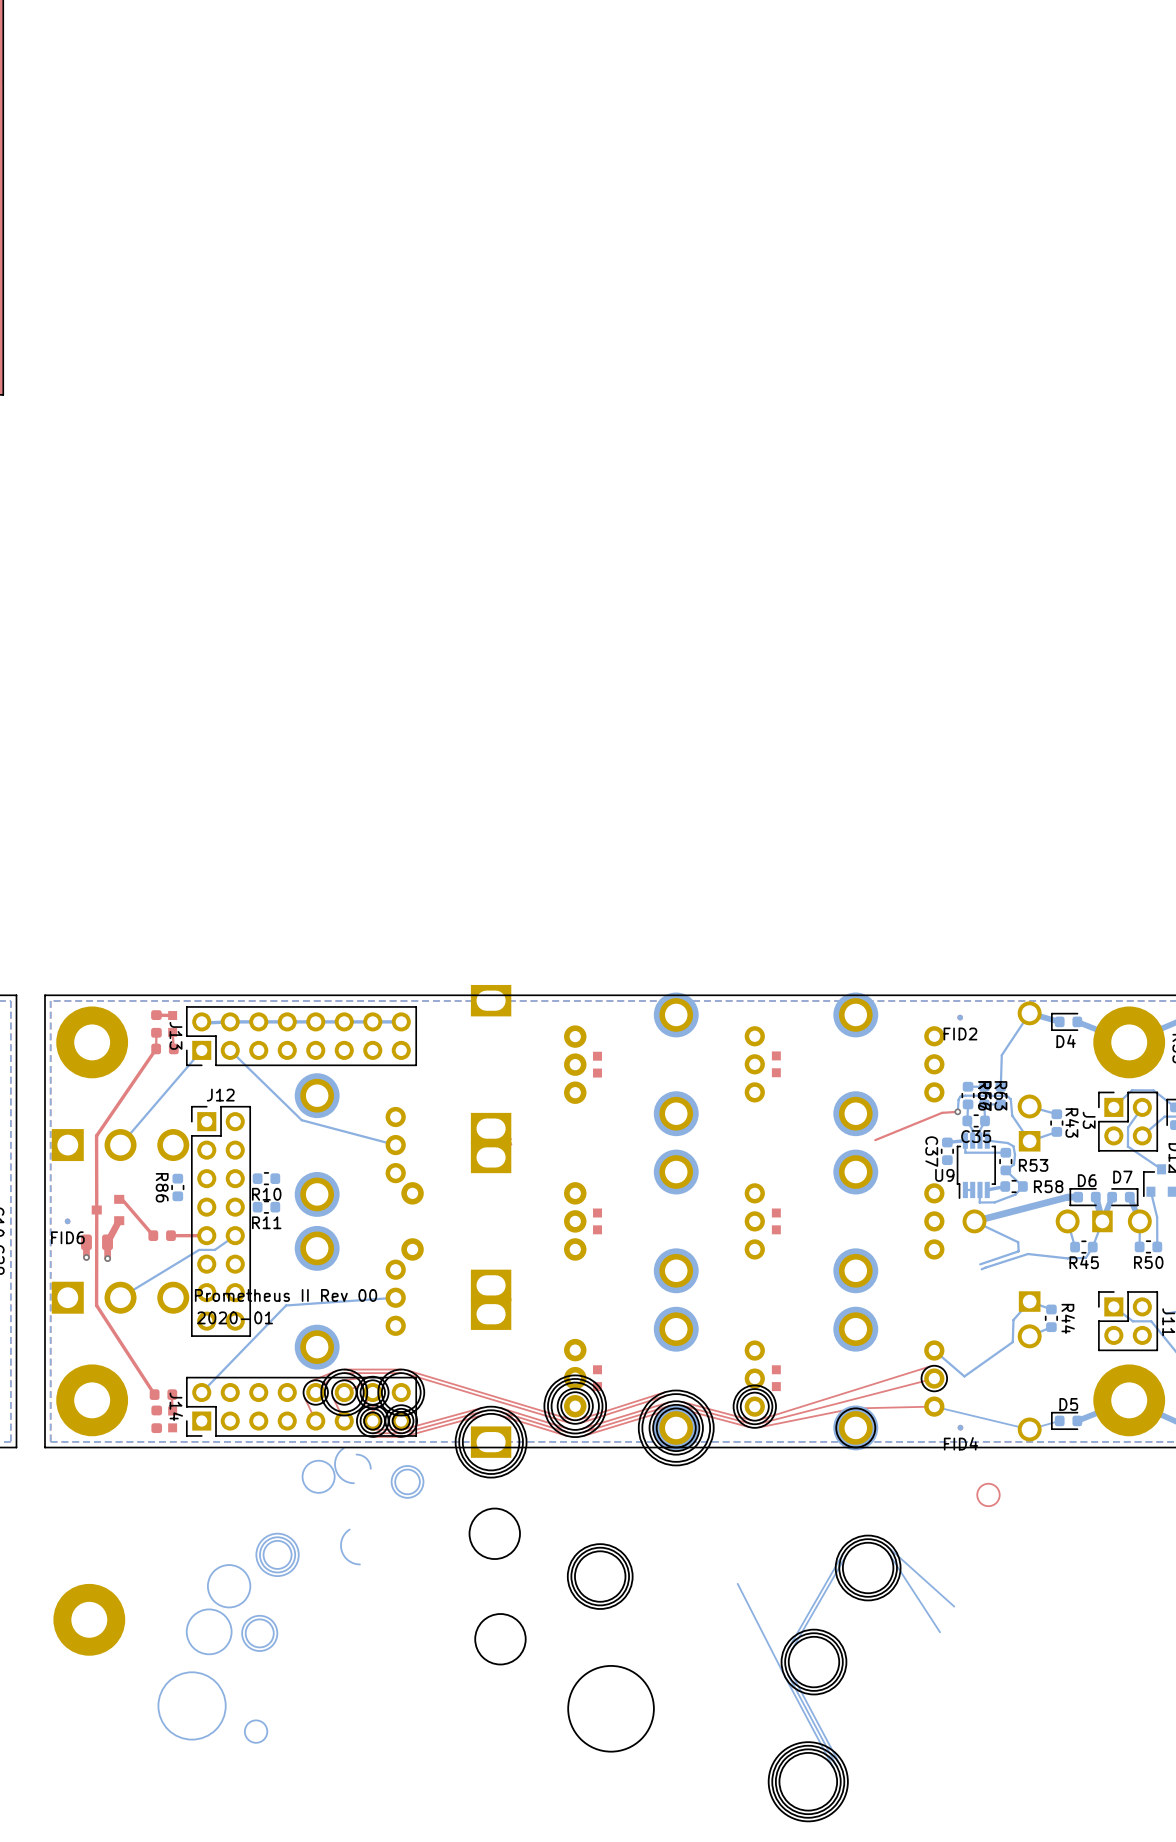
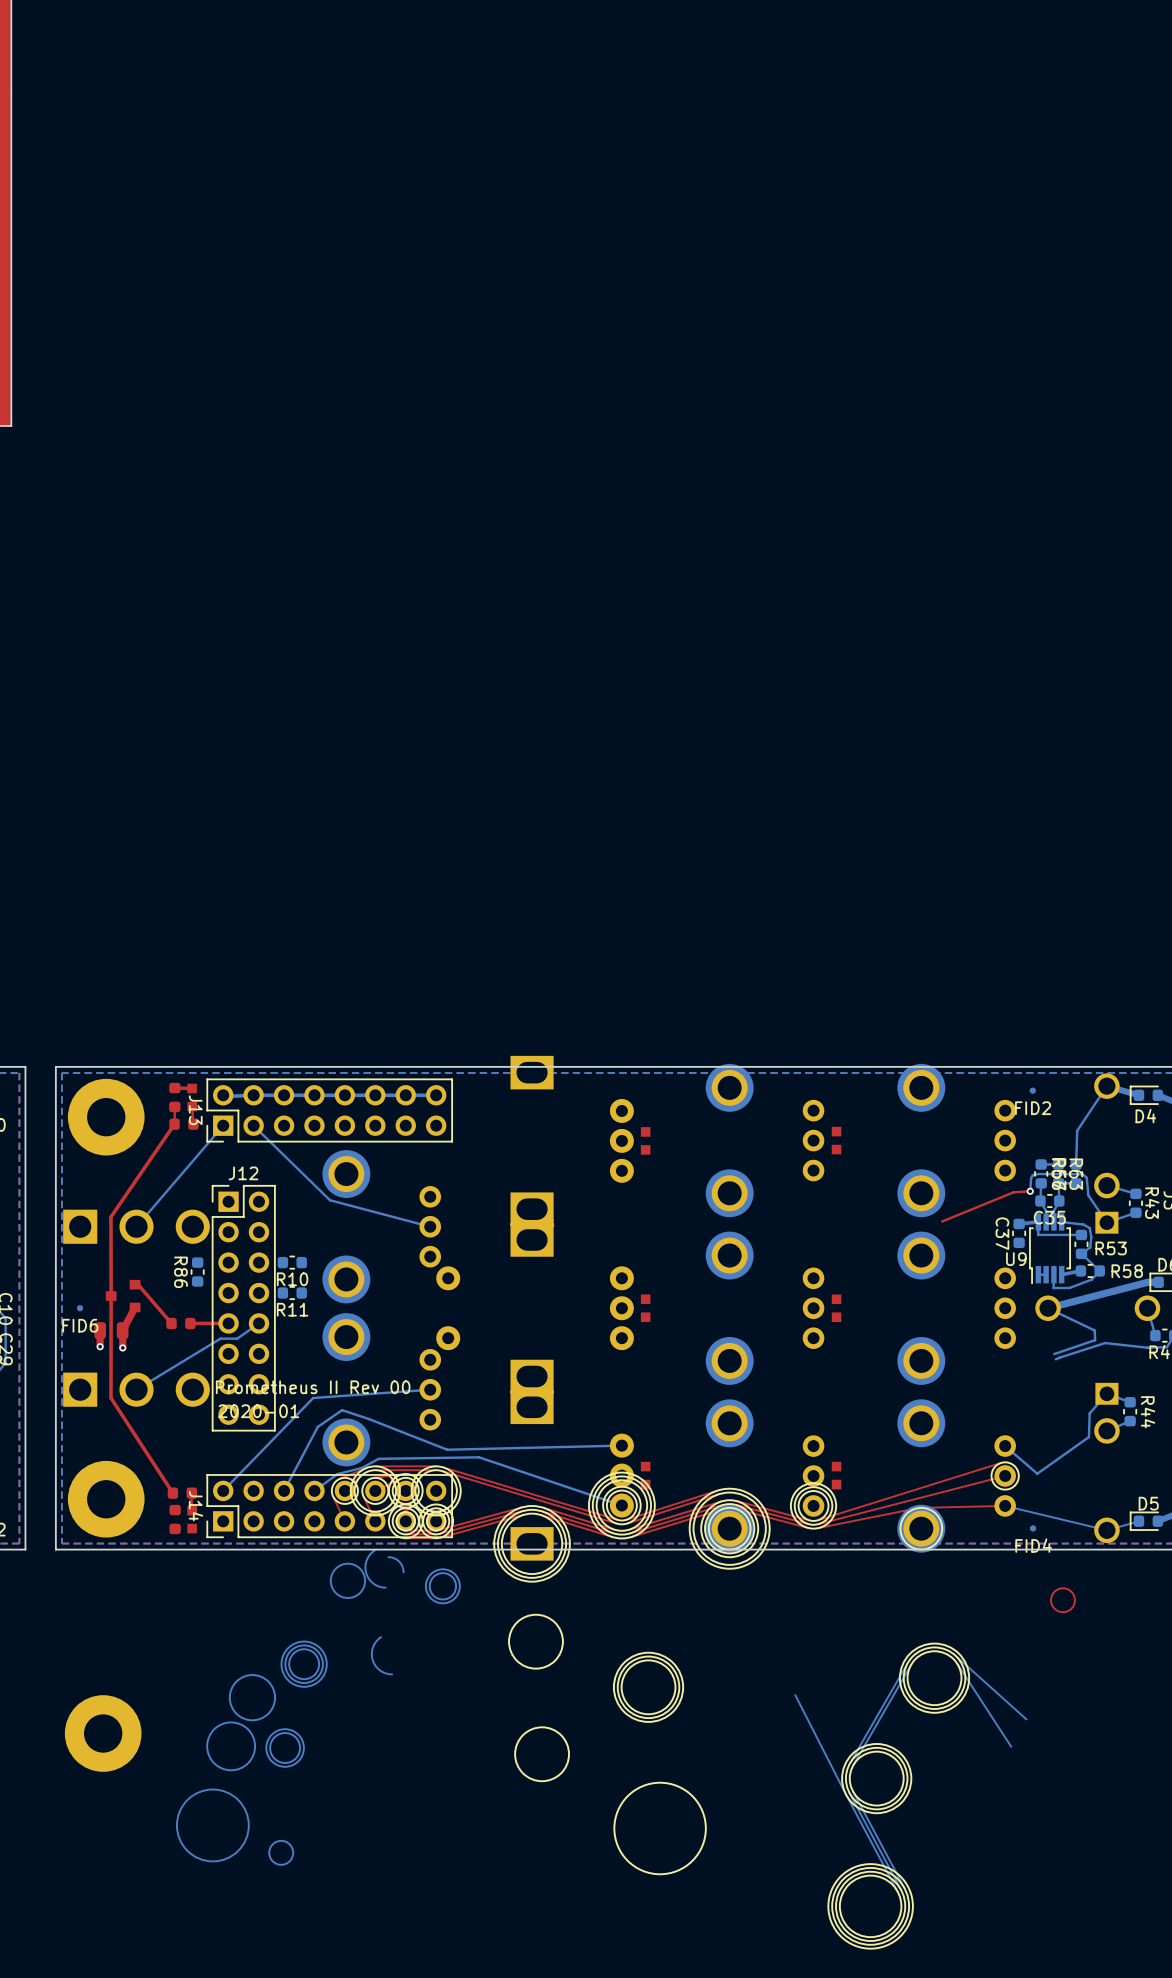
bottom track: none -> (621, 1445) (447, 1449) (342, 1410) (317, 1426) (284, 1490)
bottom track: none -> (314, 1490) (337, 1474) (361, 1467) (378, 1458) (479, 1457) (621, 1505)

